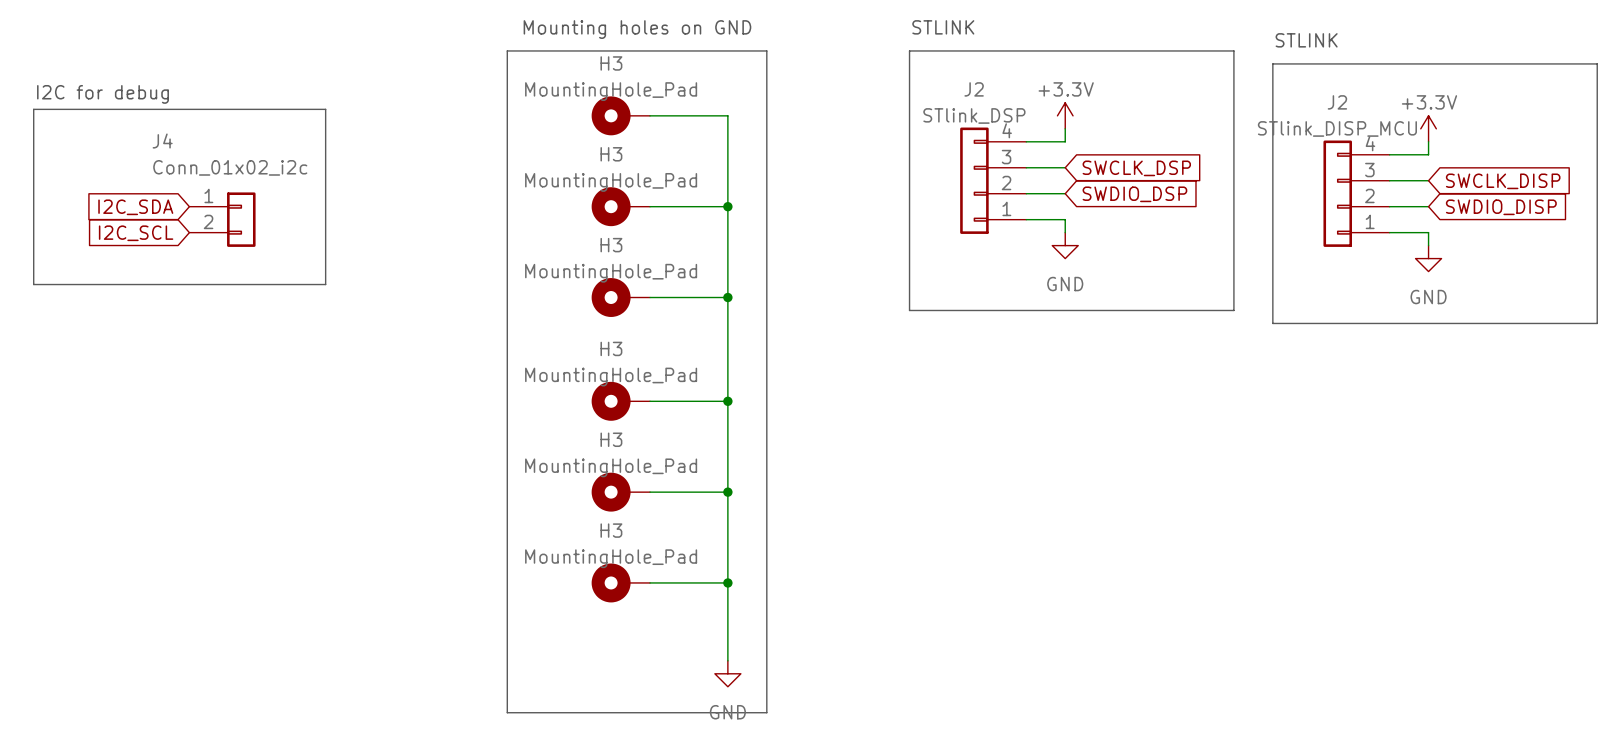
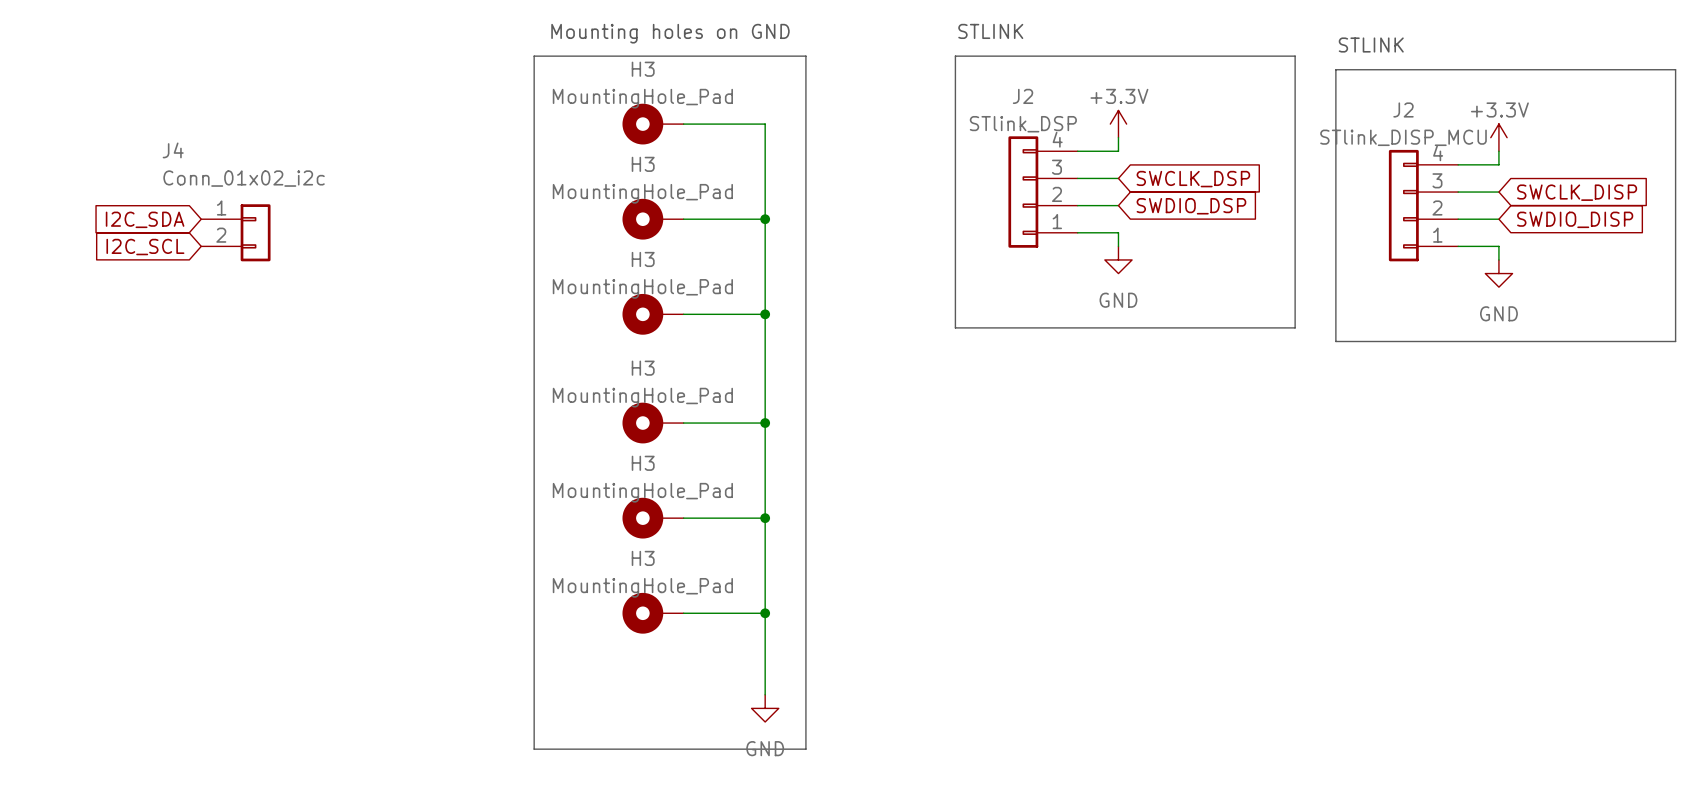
text: I2C for debug (103, 94) -> none
line: (33, 109) (325, 109) (325, 284) (33, 284) (33, 109) -> none

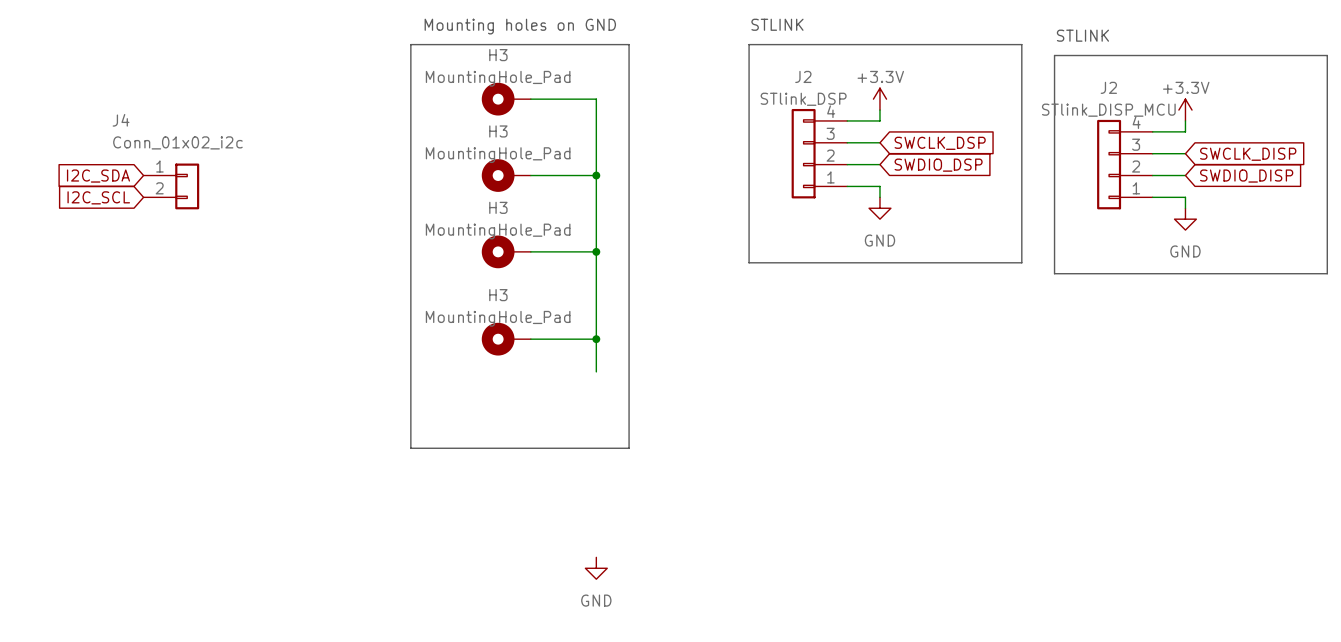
wire: (765, 463) (765, 694) -> none
H3: MountingHole_Pad (653, 518) -> none
wire: (683, 518) (765, 518) -> none
junction: (765, 518) -> none
line: (534, 558) (534, 749) (805, 749) (805, 558) -> (410, 448) (629, 448)
H3: MountingHole_Pad (653, 613) -> none
wire: (683, 613) (765, 613) -> none
junction: (765, 613) -> none

